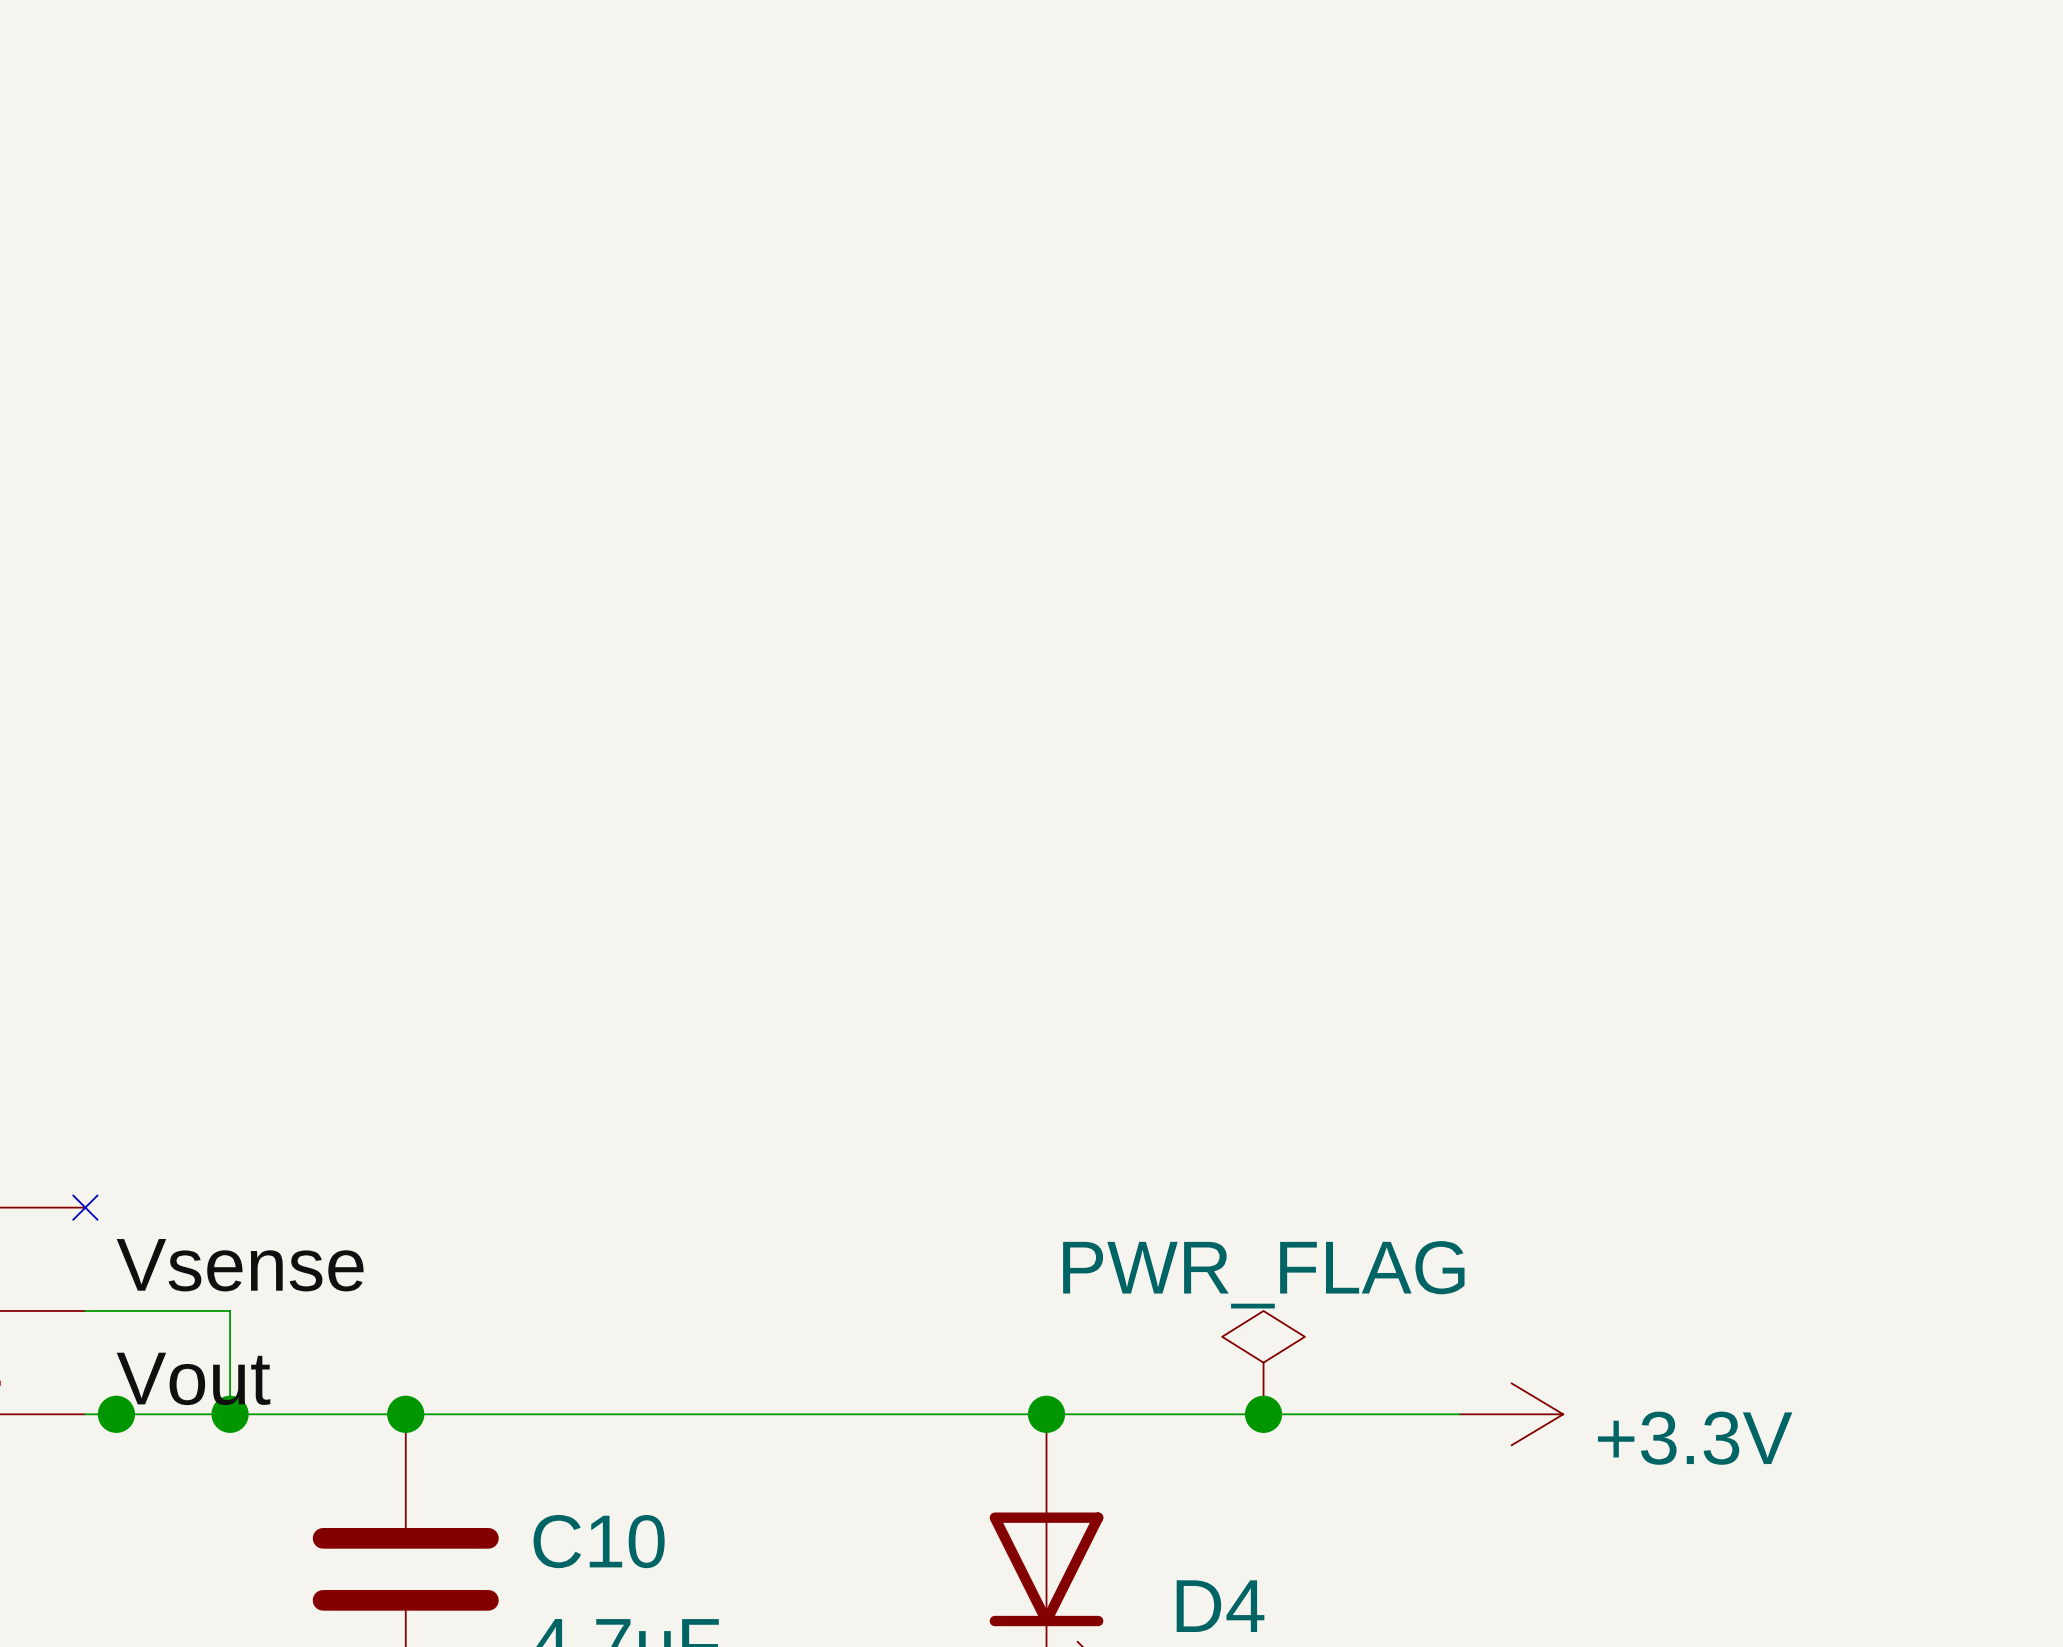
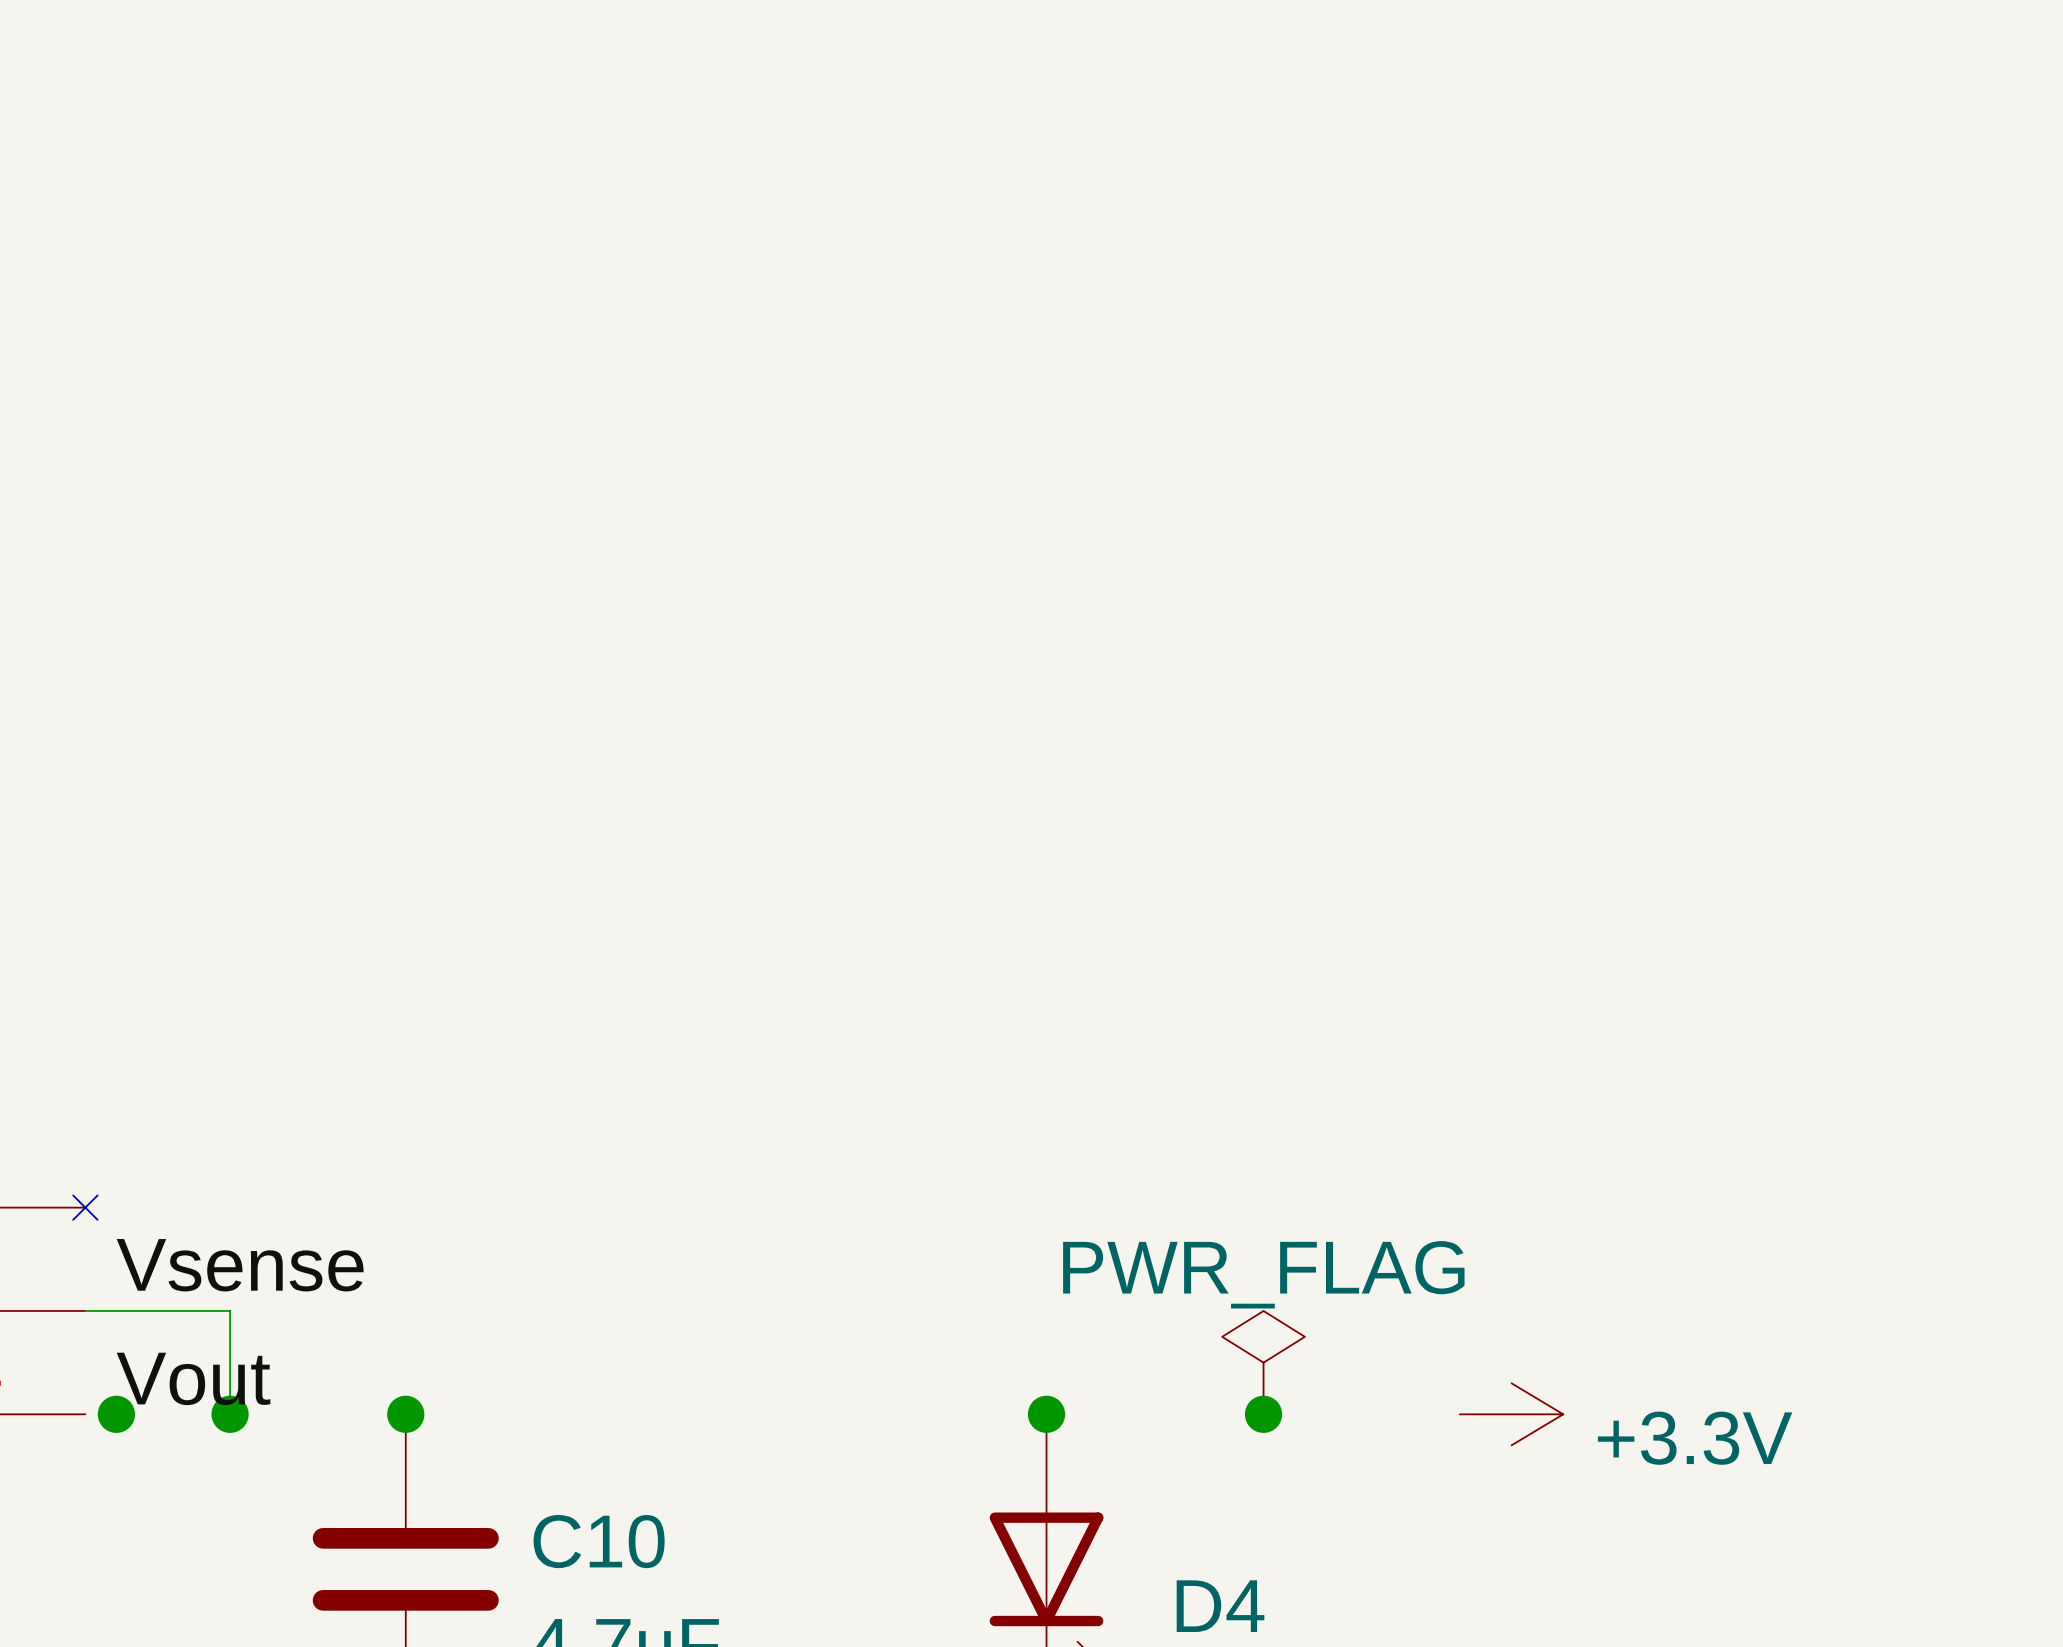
wire: (85, 1414) (1459, 1414) -> none

